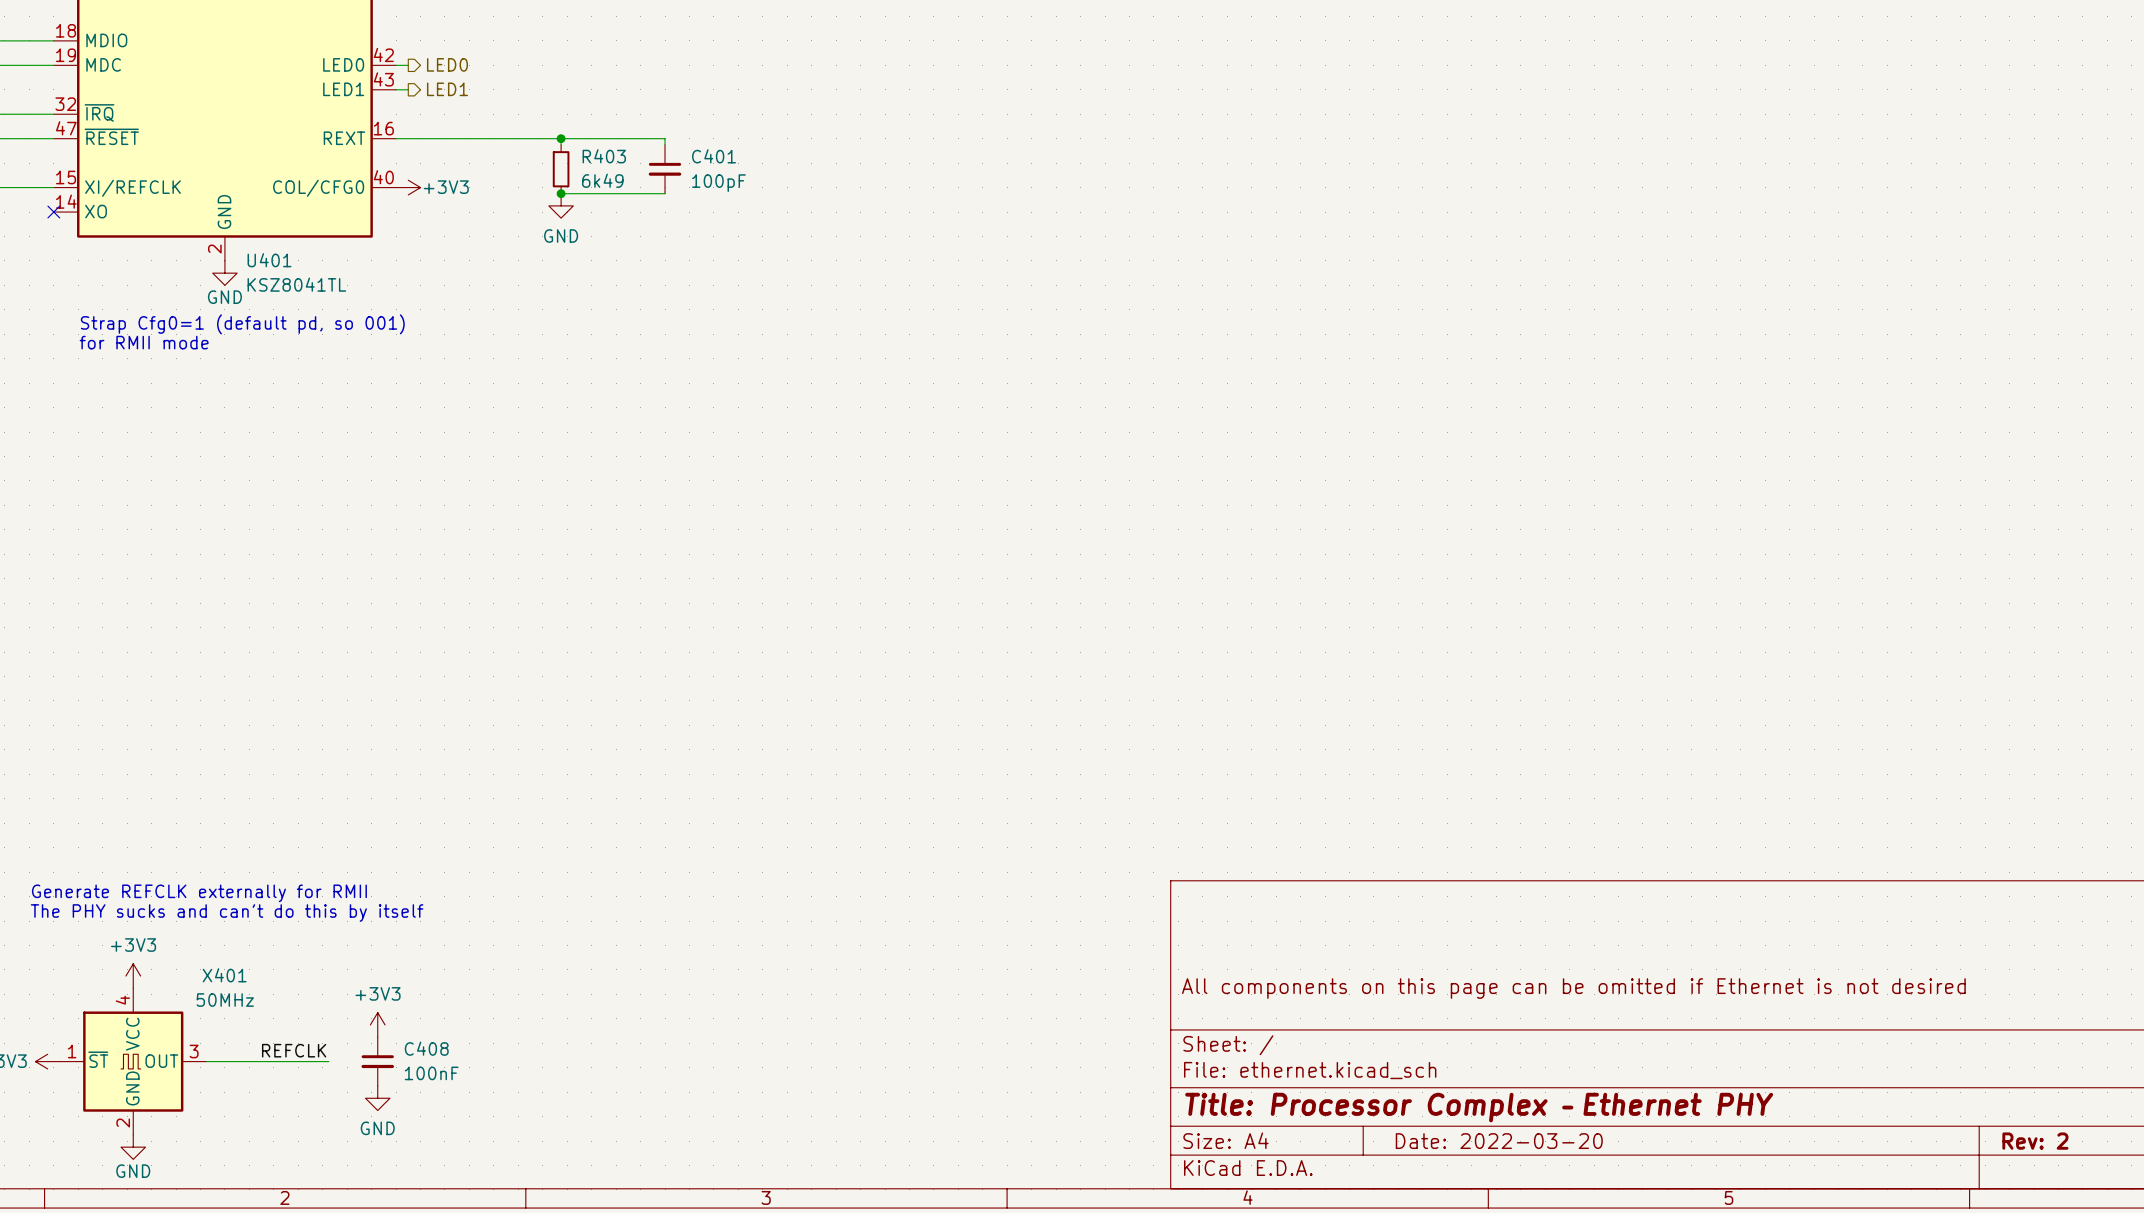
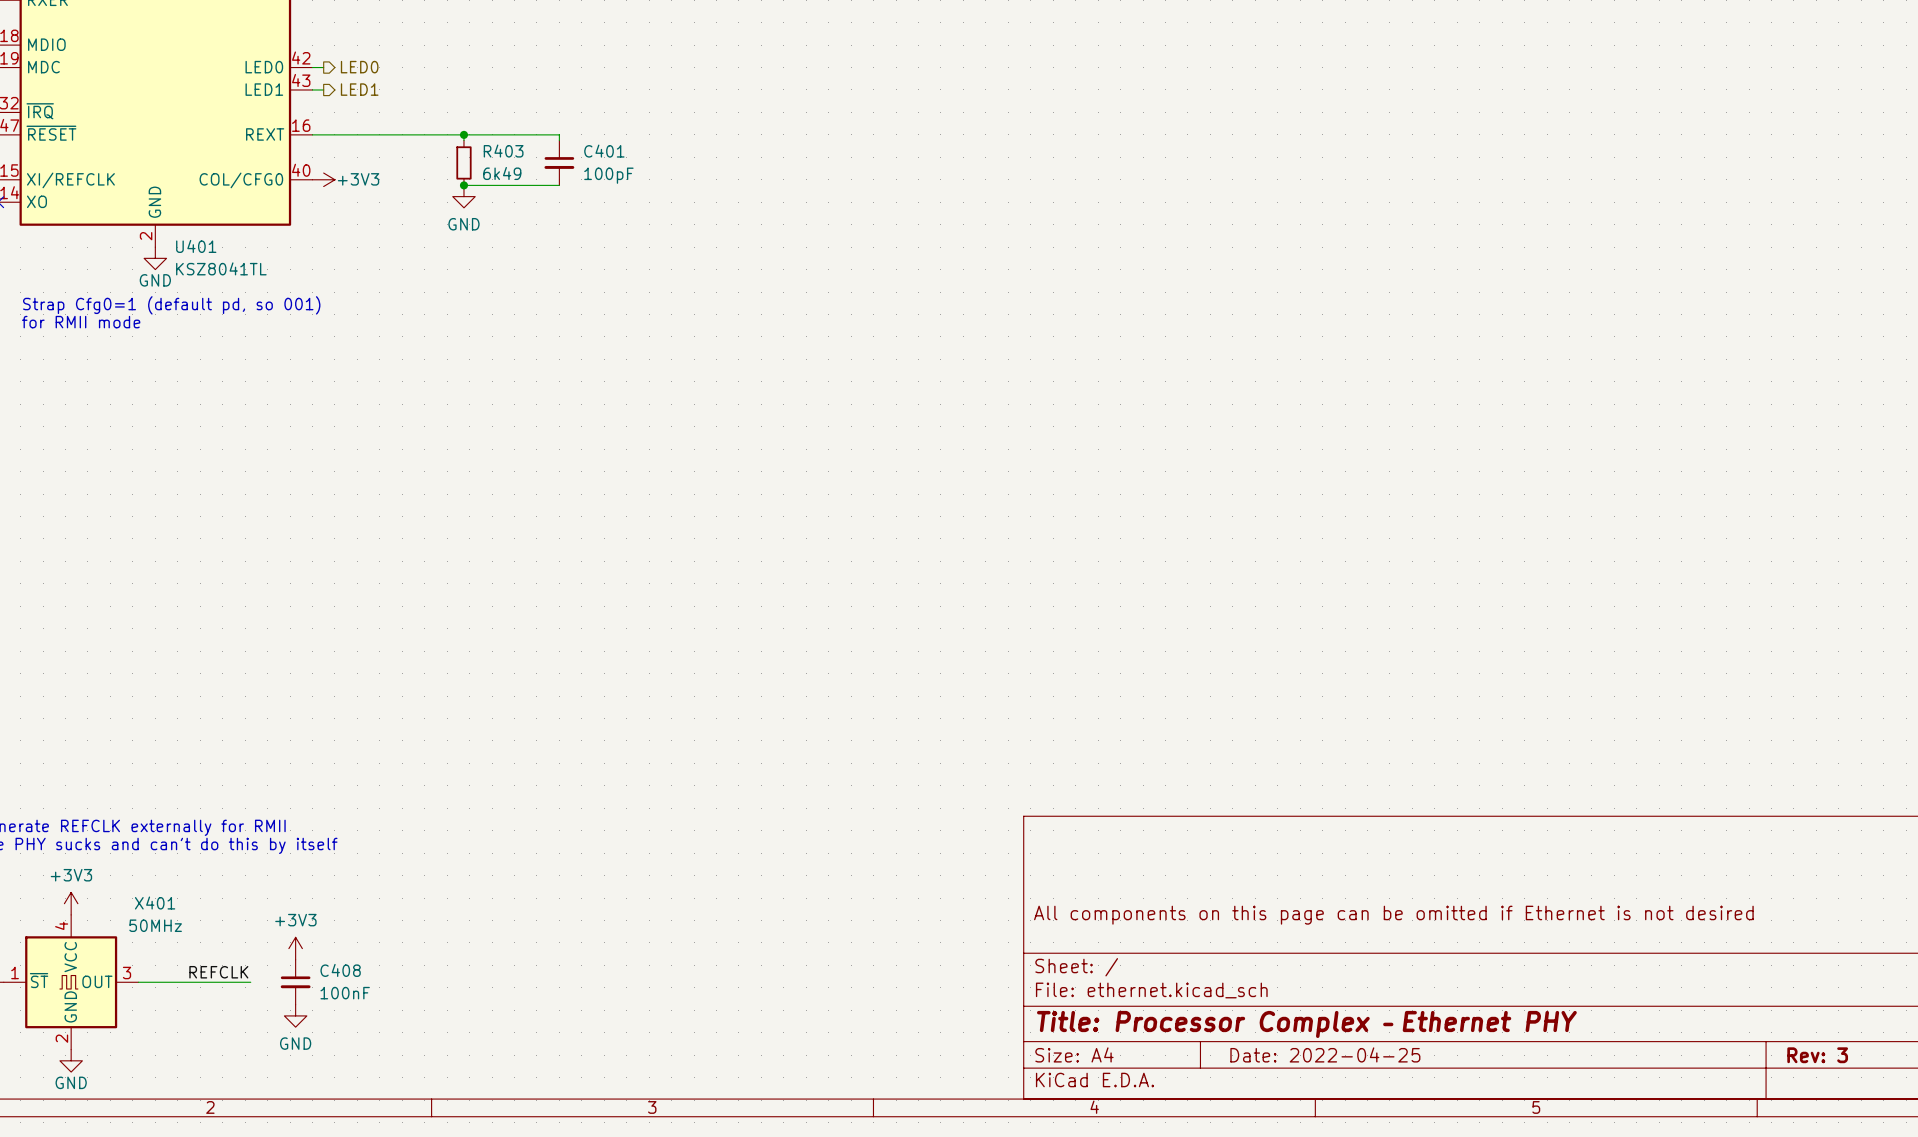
title block: Date: 2022-03-20 (1499, 1141) -> Date: 2022-04-25 (1325, 1054)
title block: Rev: 2 (2035, 1141) -> Rev: 3 (1817, 1055)

